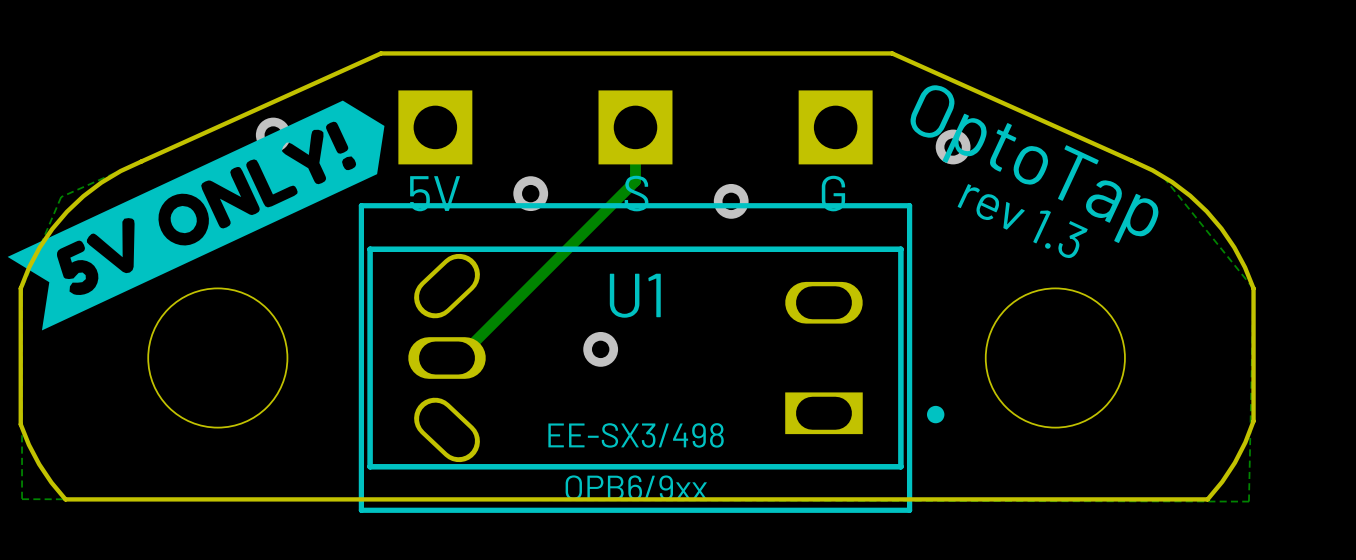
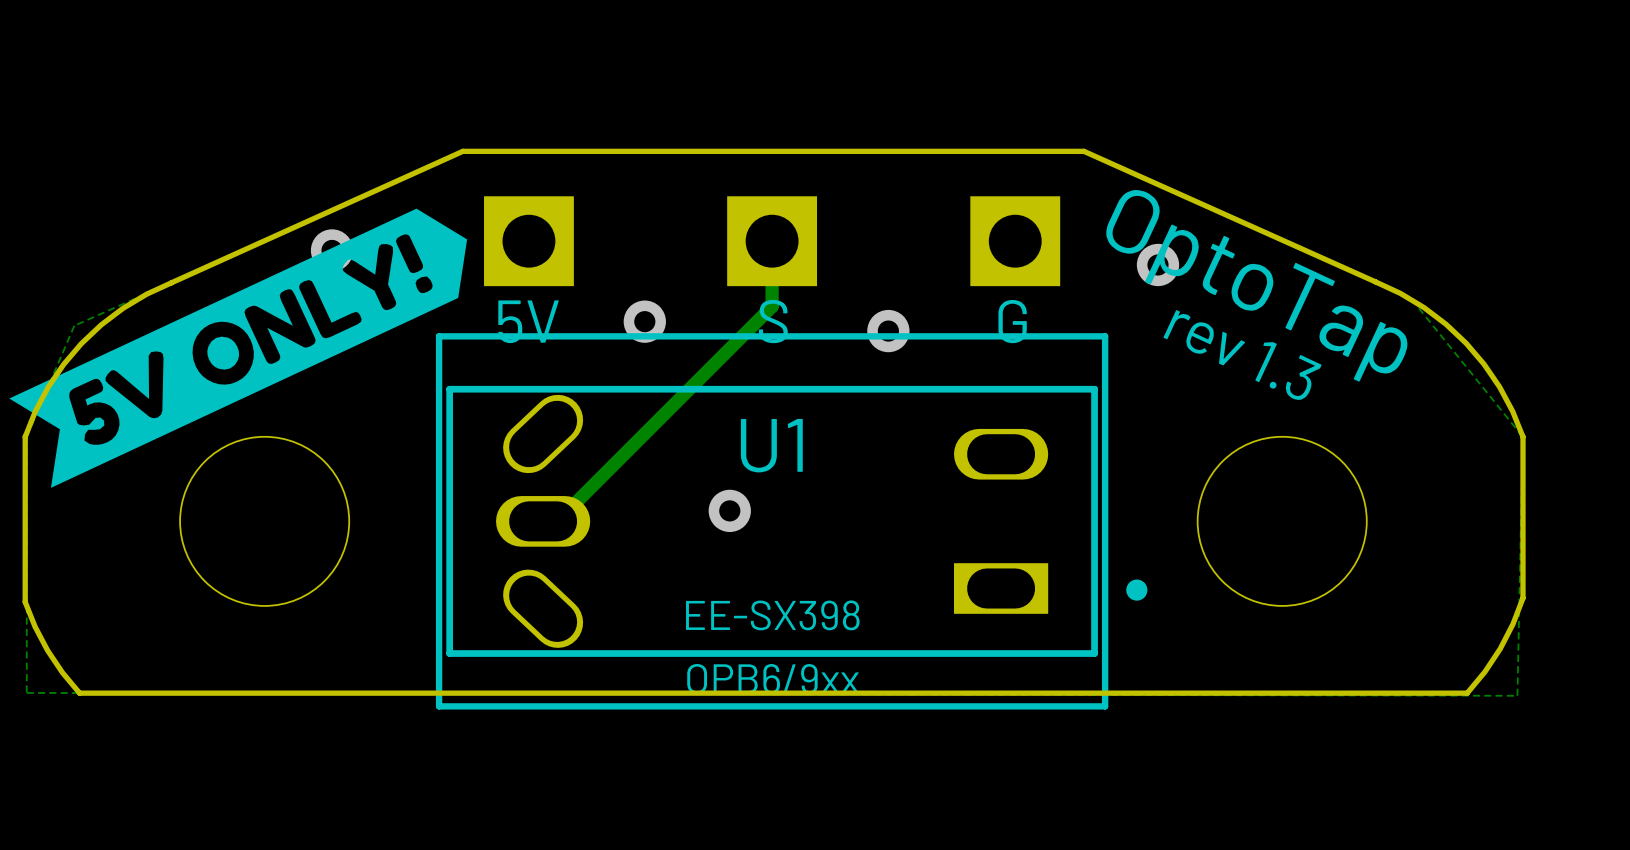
U1 text: EE-SX3/498 (636, 435) -> EE-SX398 (772, 615)

